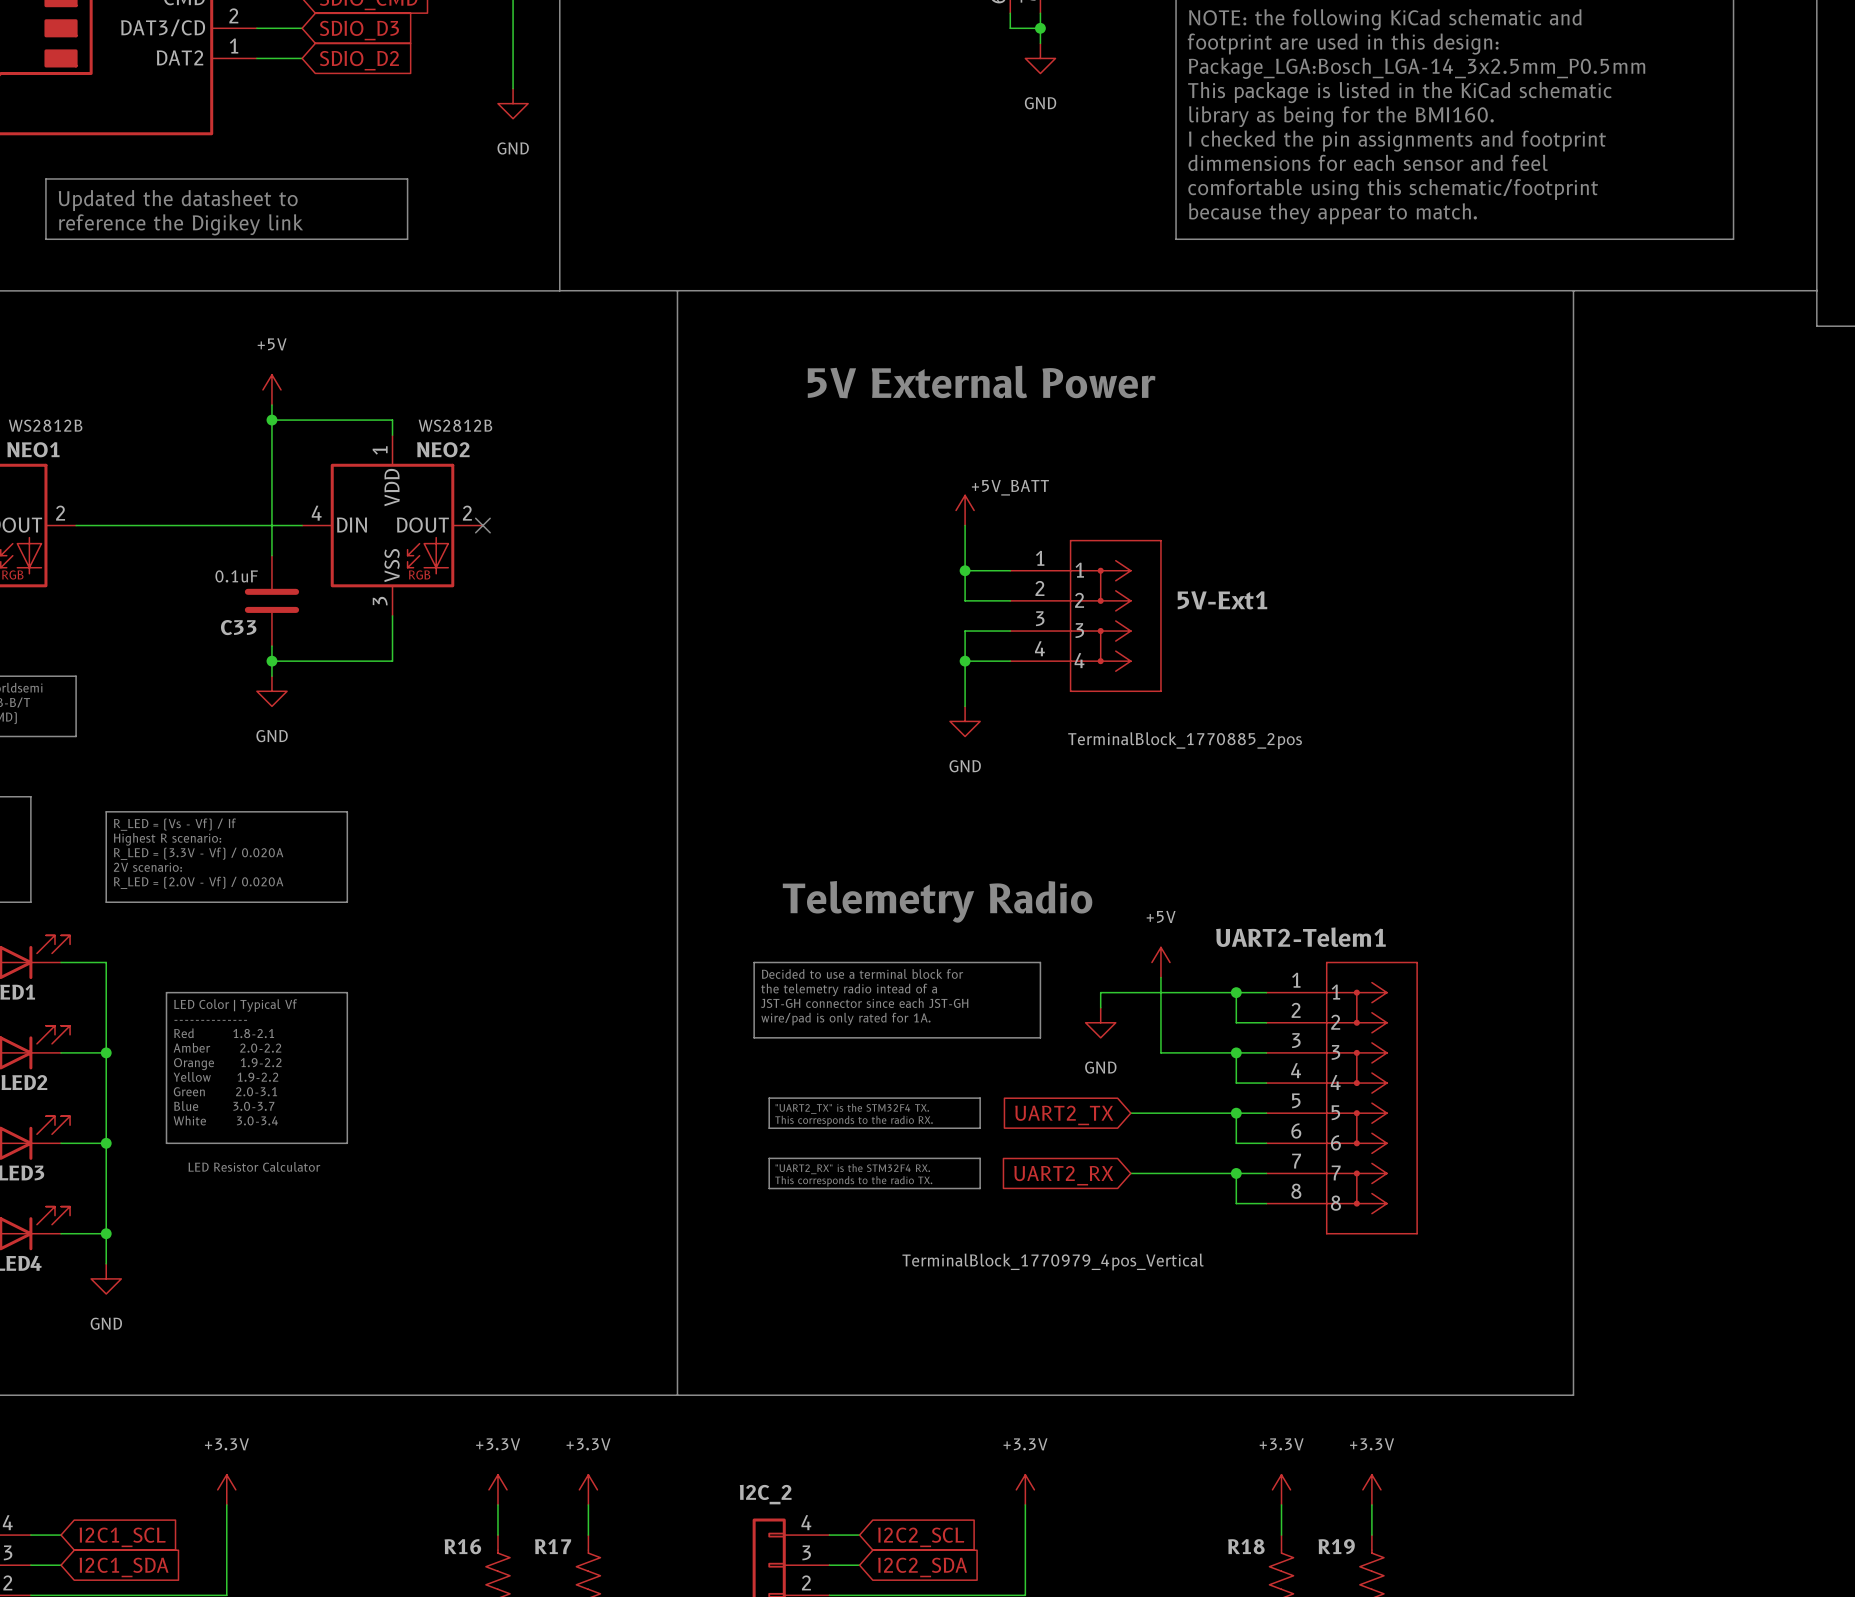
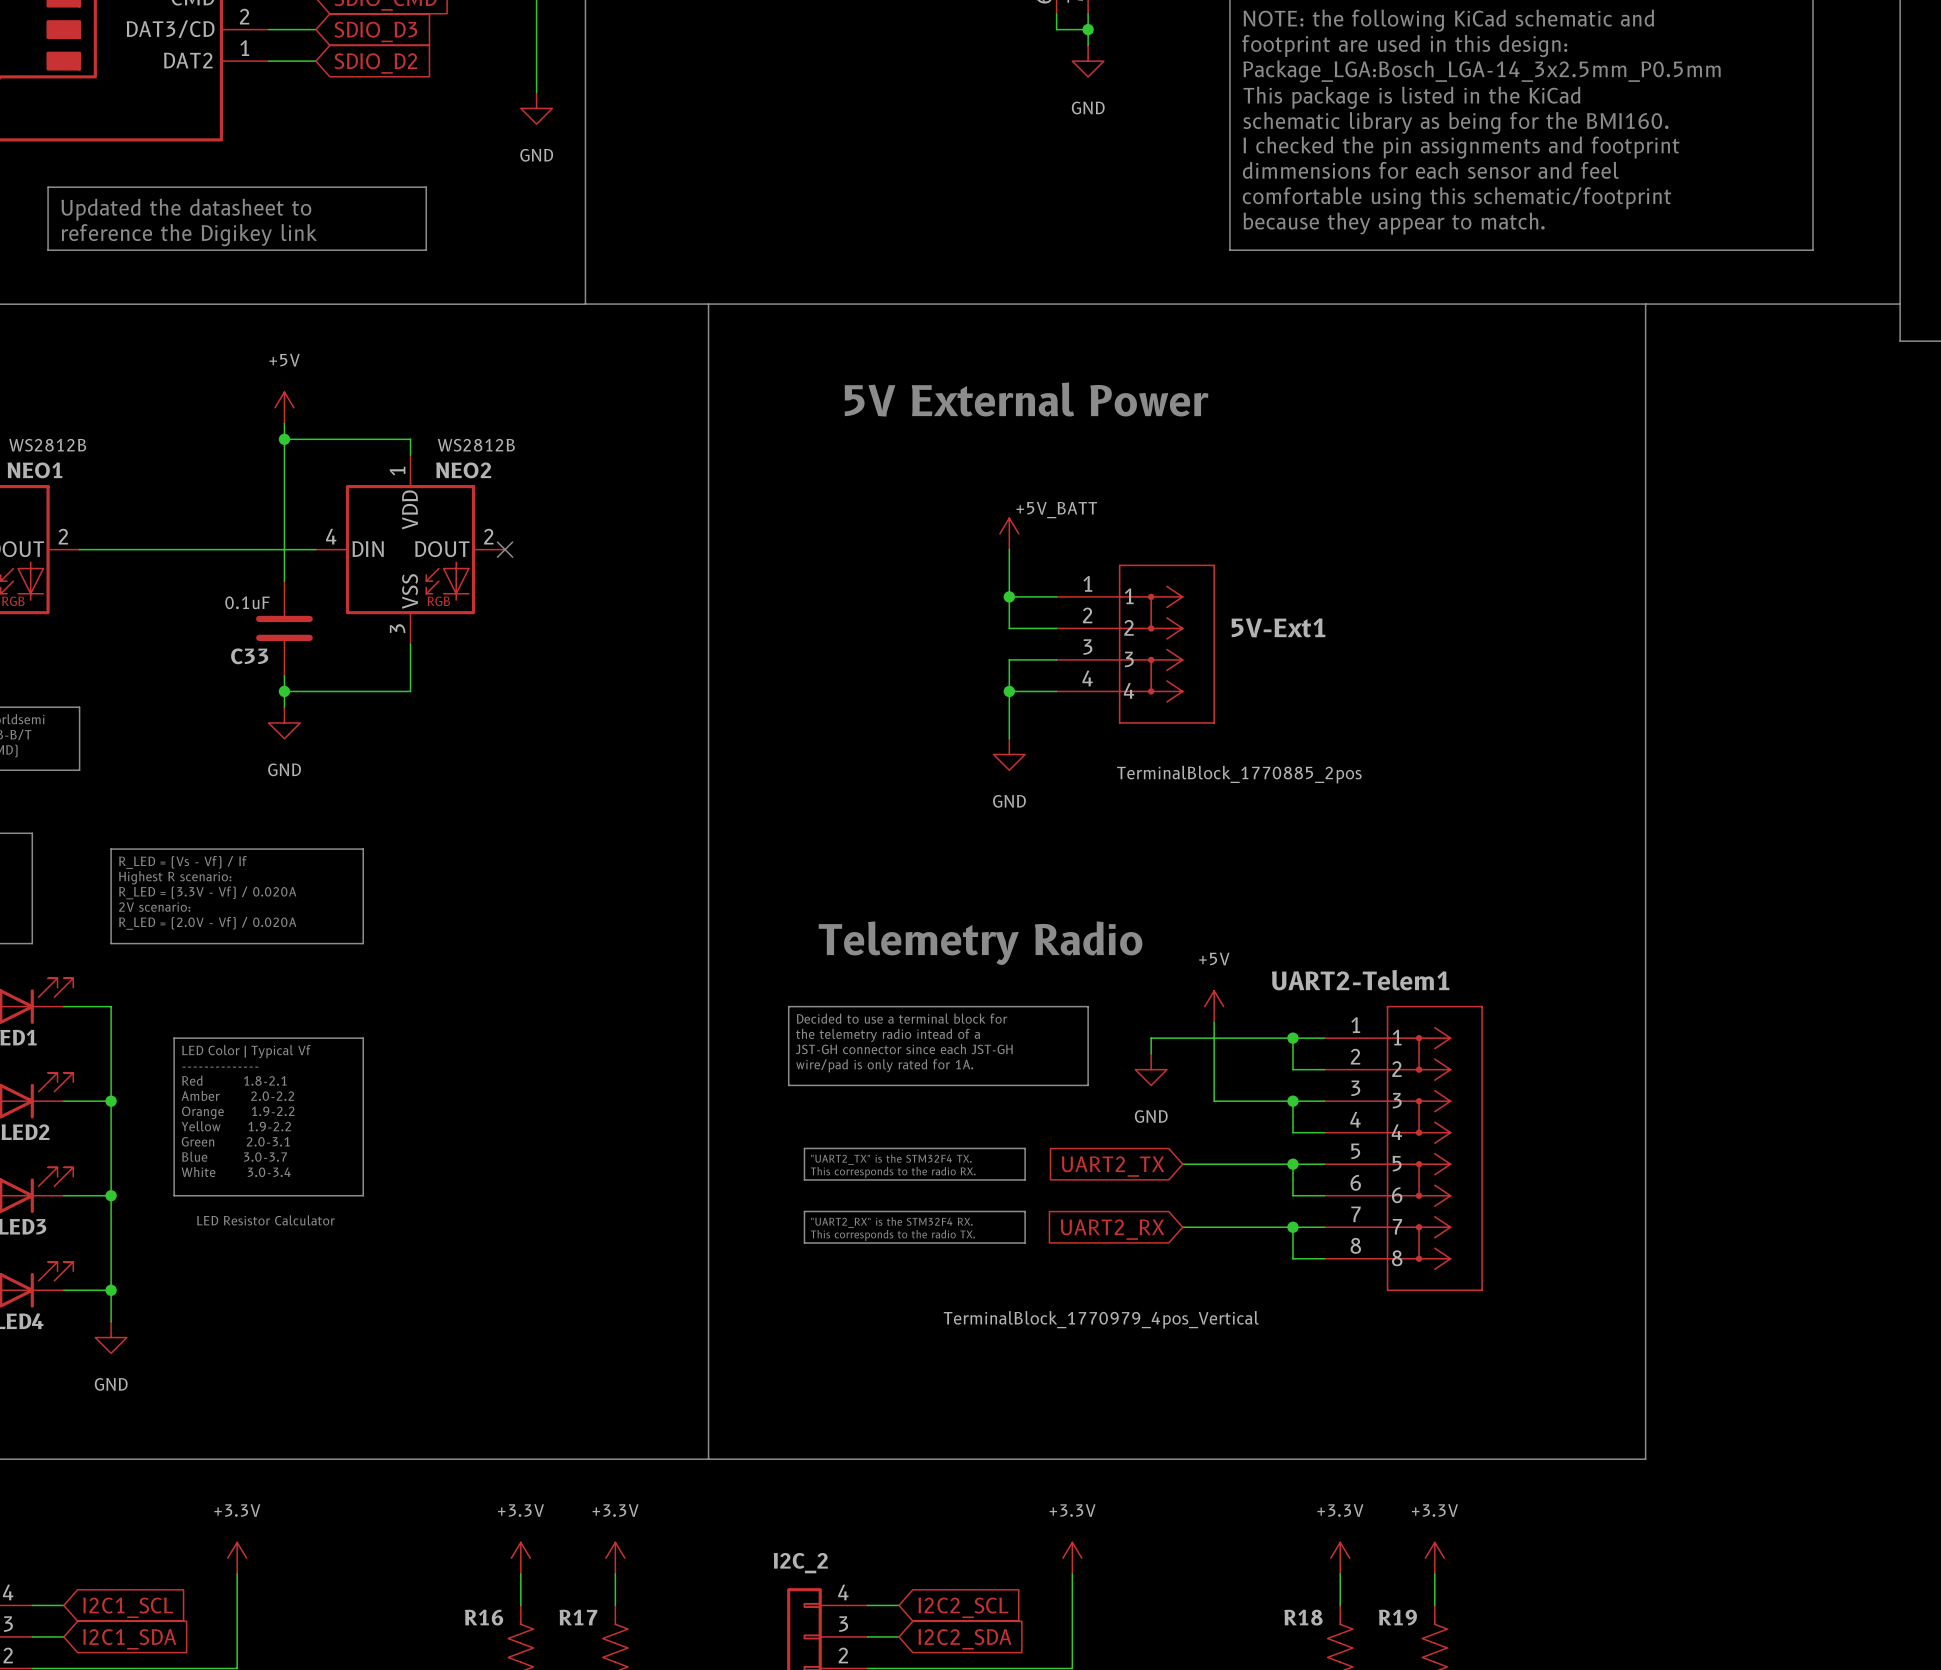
text: This package is listed in the KiCad schematic (1399, 92) -> This package is listed in the KiCad (1411, 97)
text: library as being for the BMI160. (1341, 116) -> schematic library as being for the BMI160. (1455, 123)

